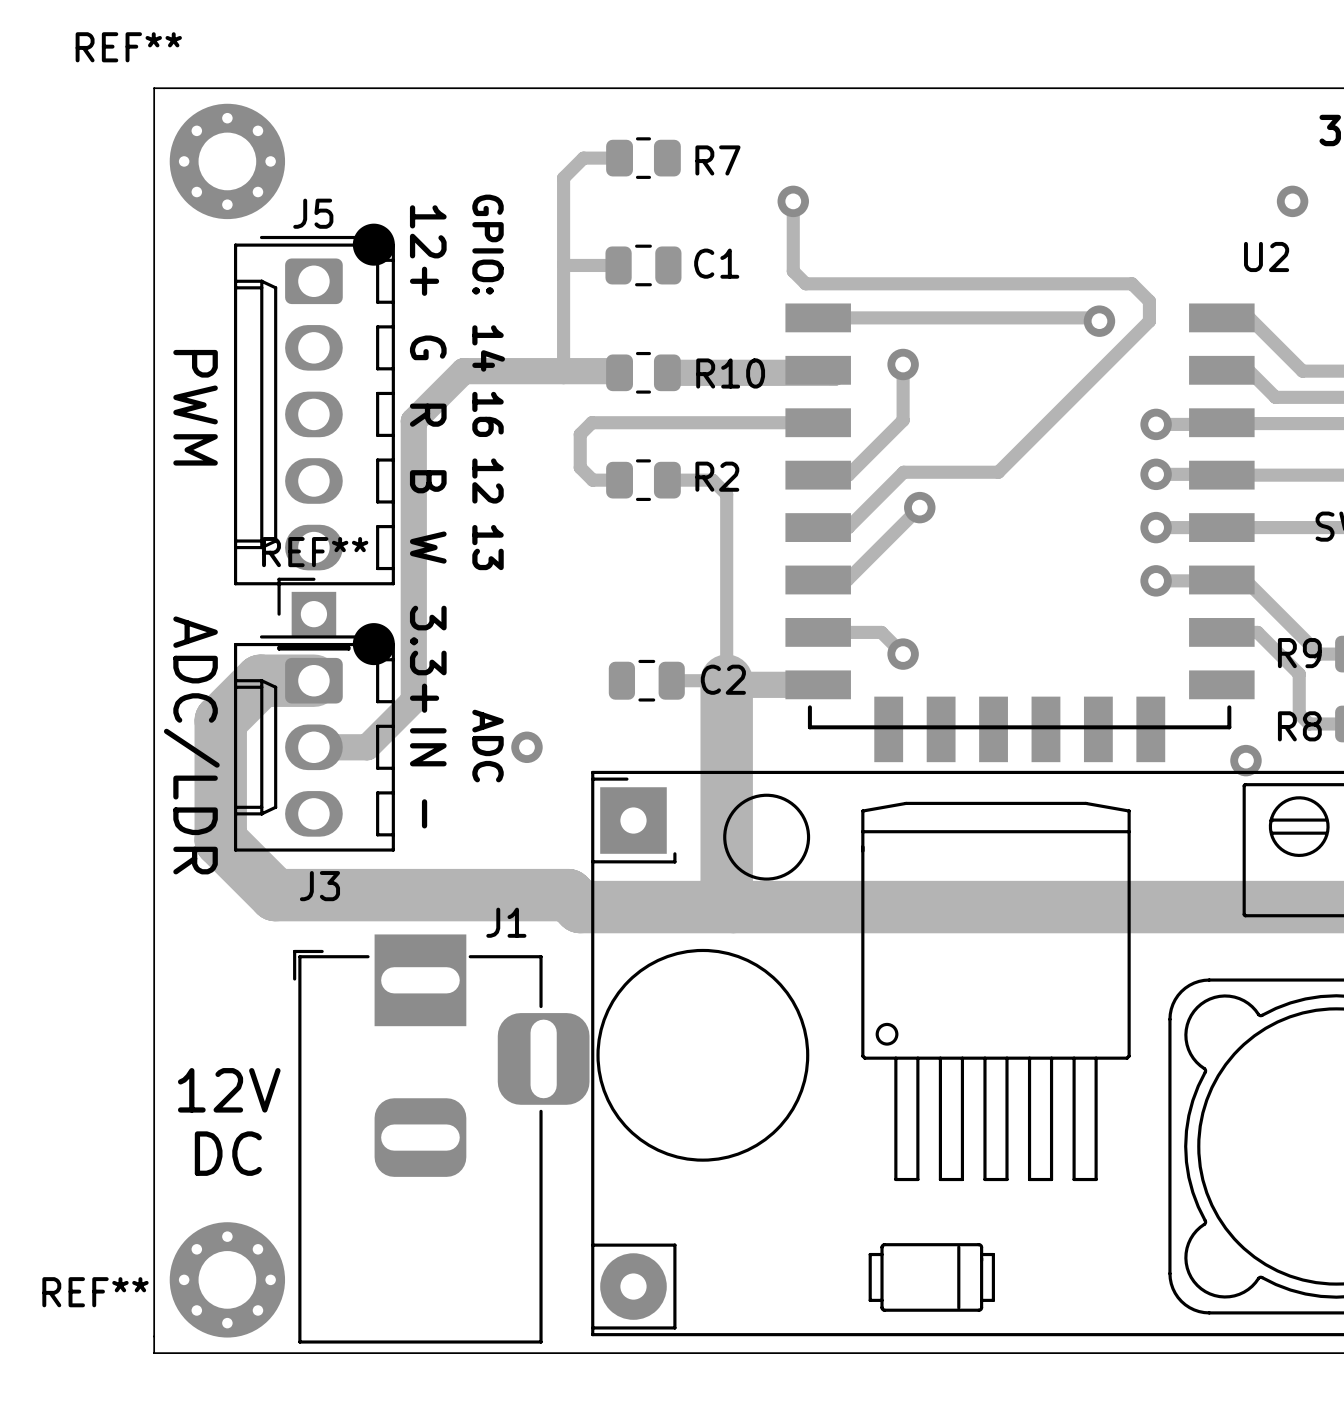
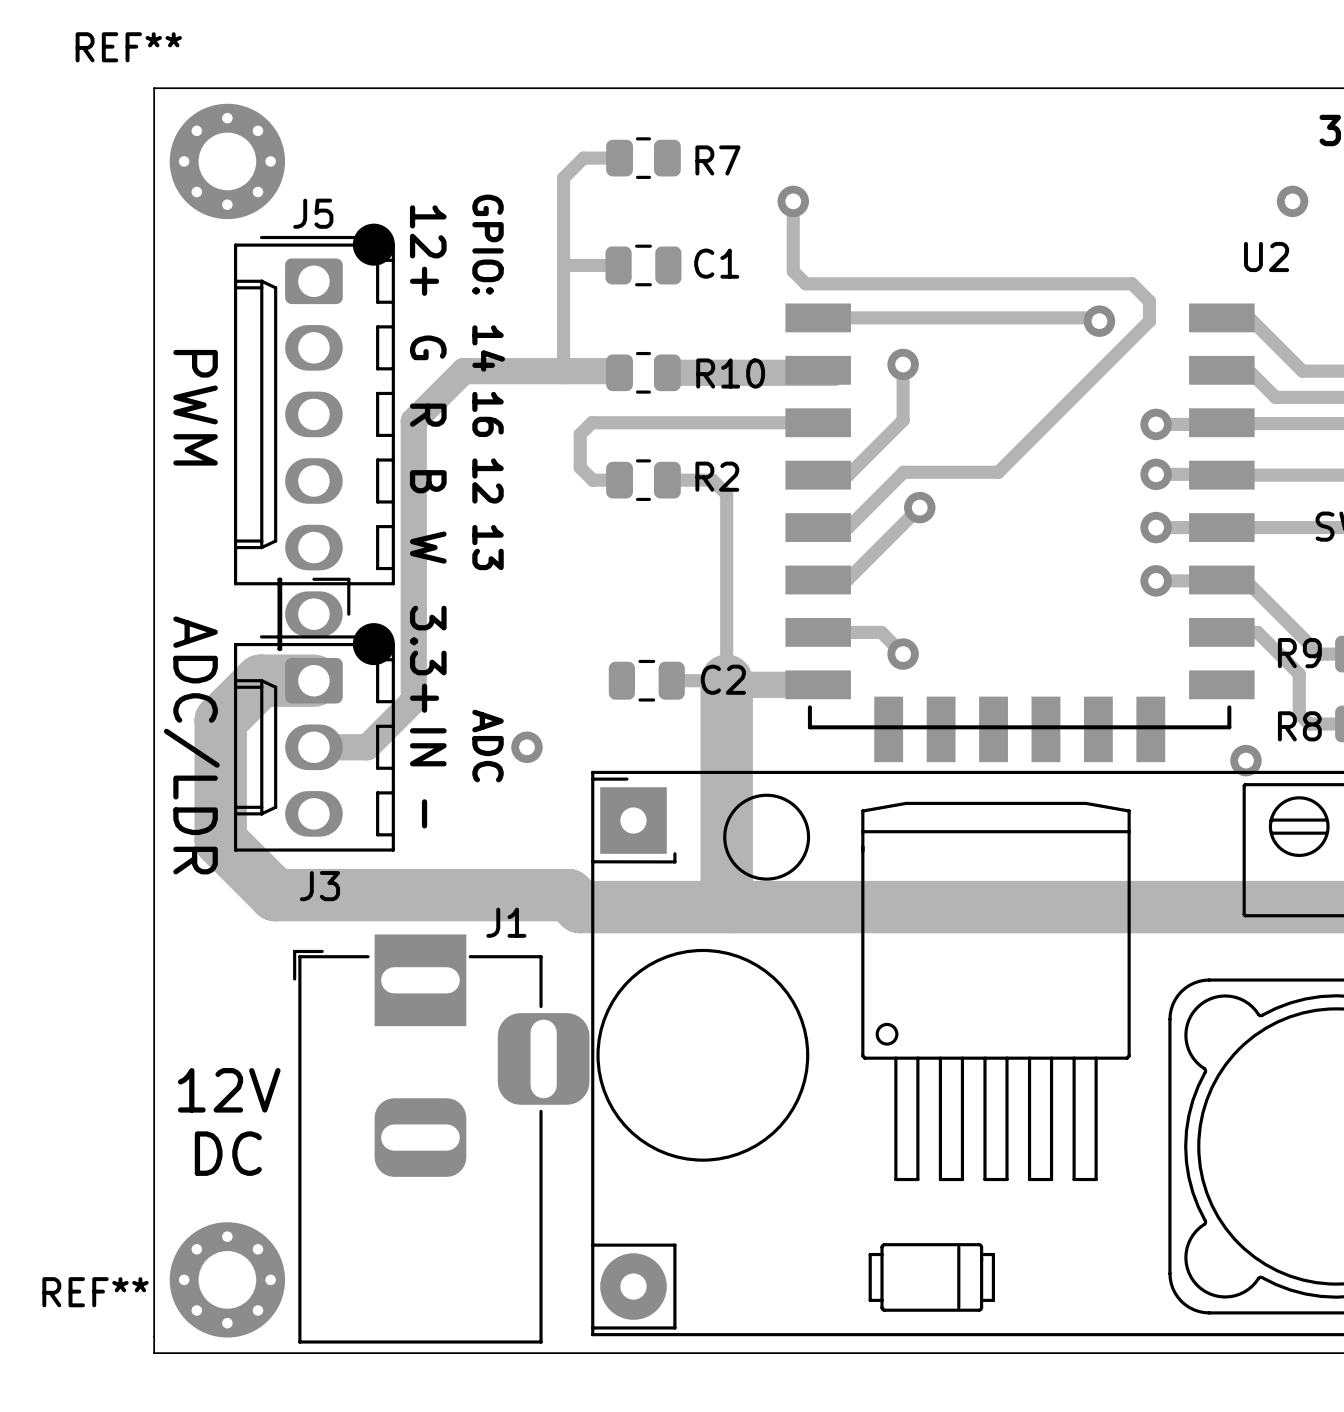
REF**: (313, 614) -> none
part: none -> (313, 614)

